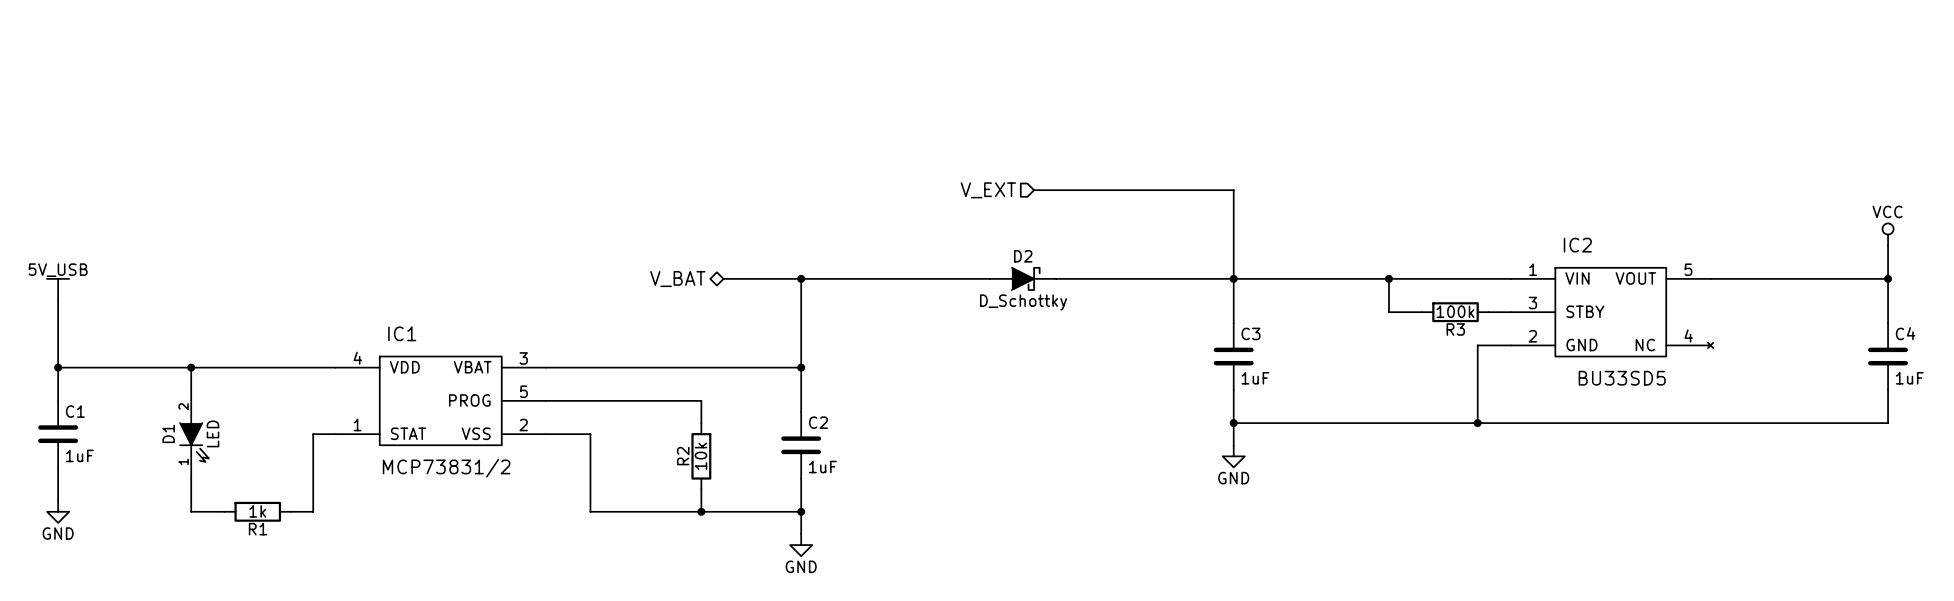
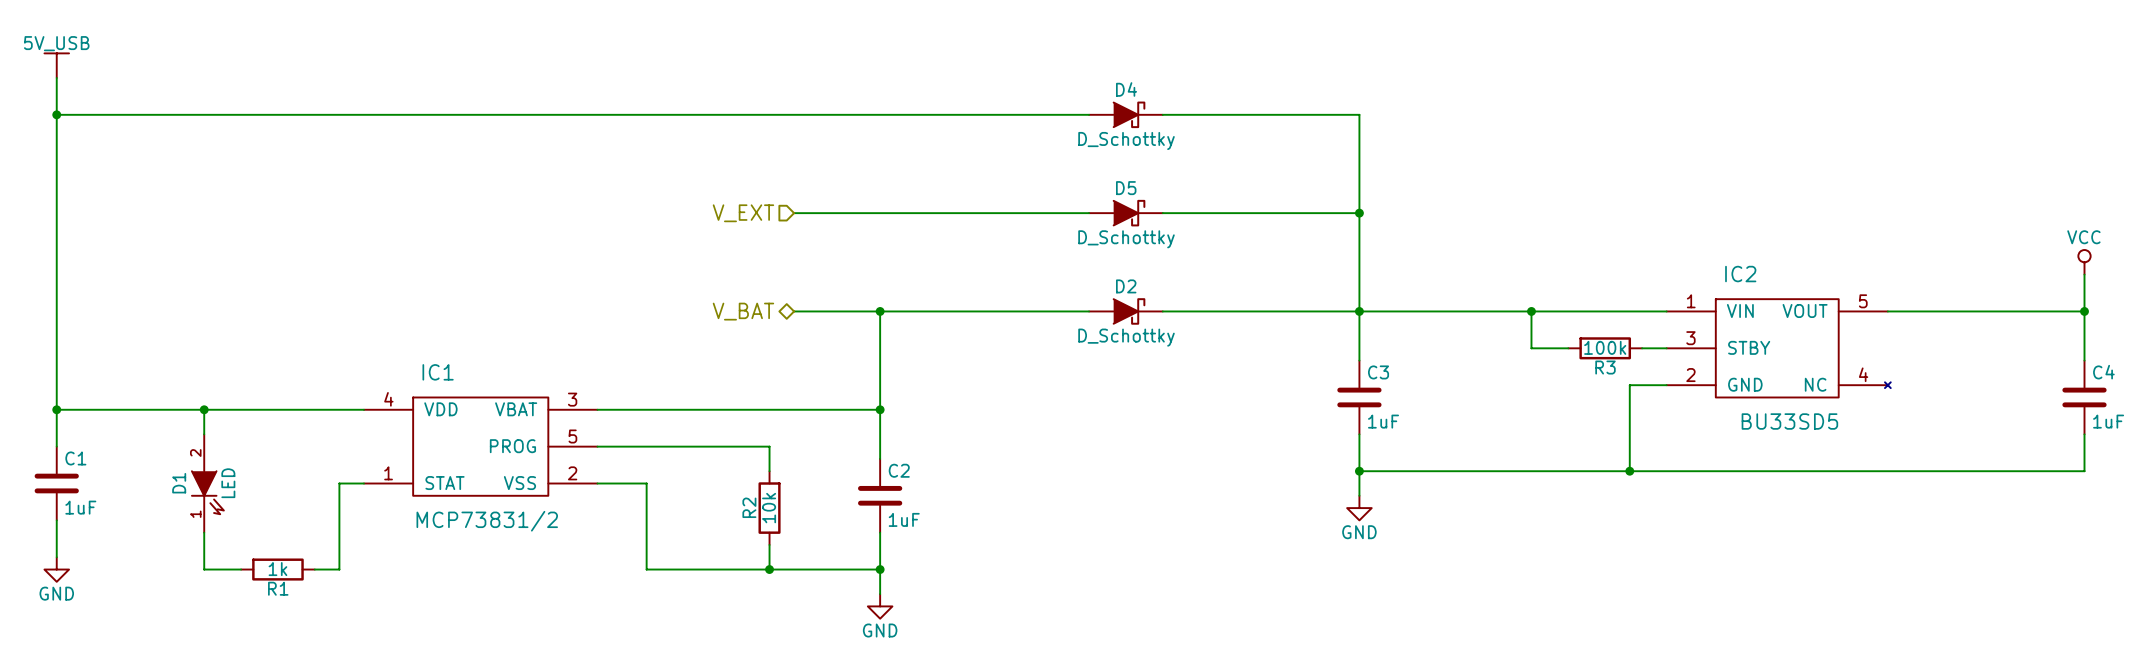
power symbol: none -> 5V_USB (56, 65)
wire: none -> (56, 77) (56, 336)
wire: none -> (56, 114) (1089, 114)
junction: none -> (56, 114)
D4: none -> D_Schottky (1125, 114)
wire: none -> (1162, 114) (1359, 114) (1359, 213)
hierarchical label: none -> V_EXT (743, 213)
wire: none -> (794, 213) (1089, 213)
hierarchical label: V_EXT (988, 190) -> none
D5: none -> D_Schottky (1125, 213)
junction: none -> (1359, 213)
power symbol: 5V_USB (58, 289) -> none

